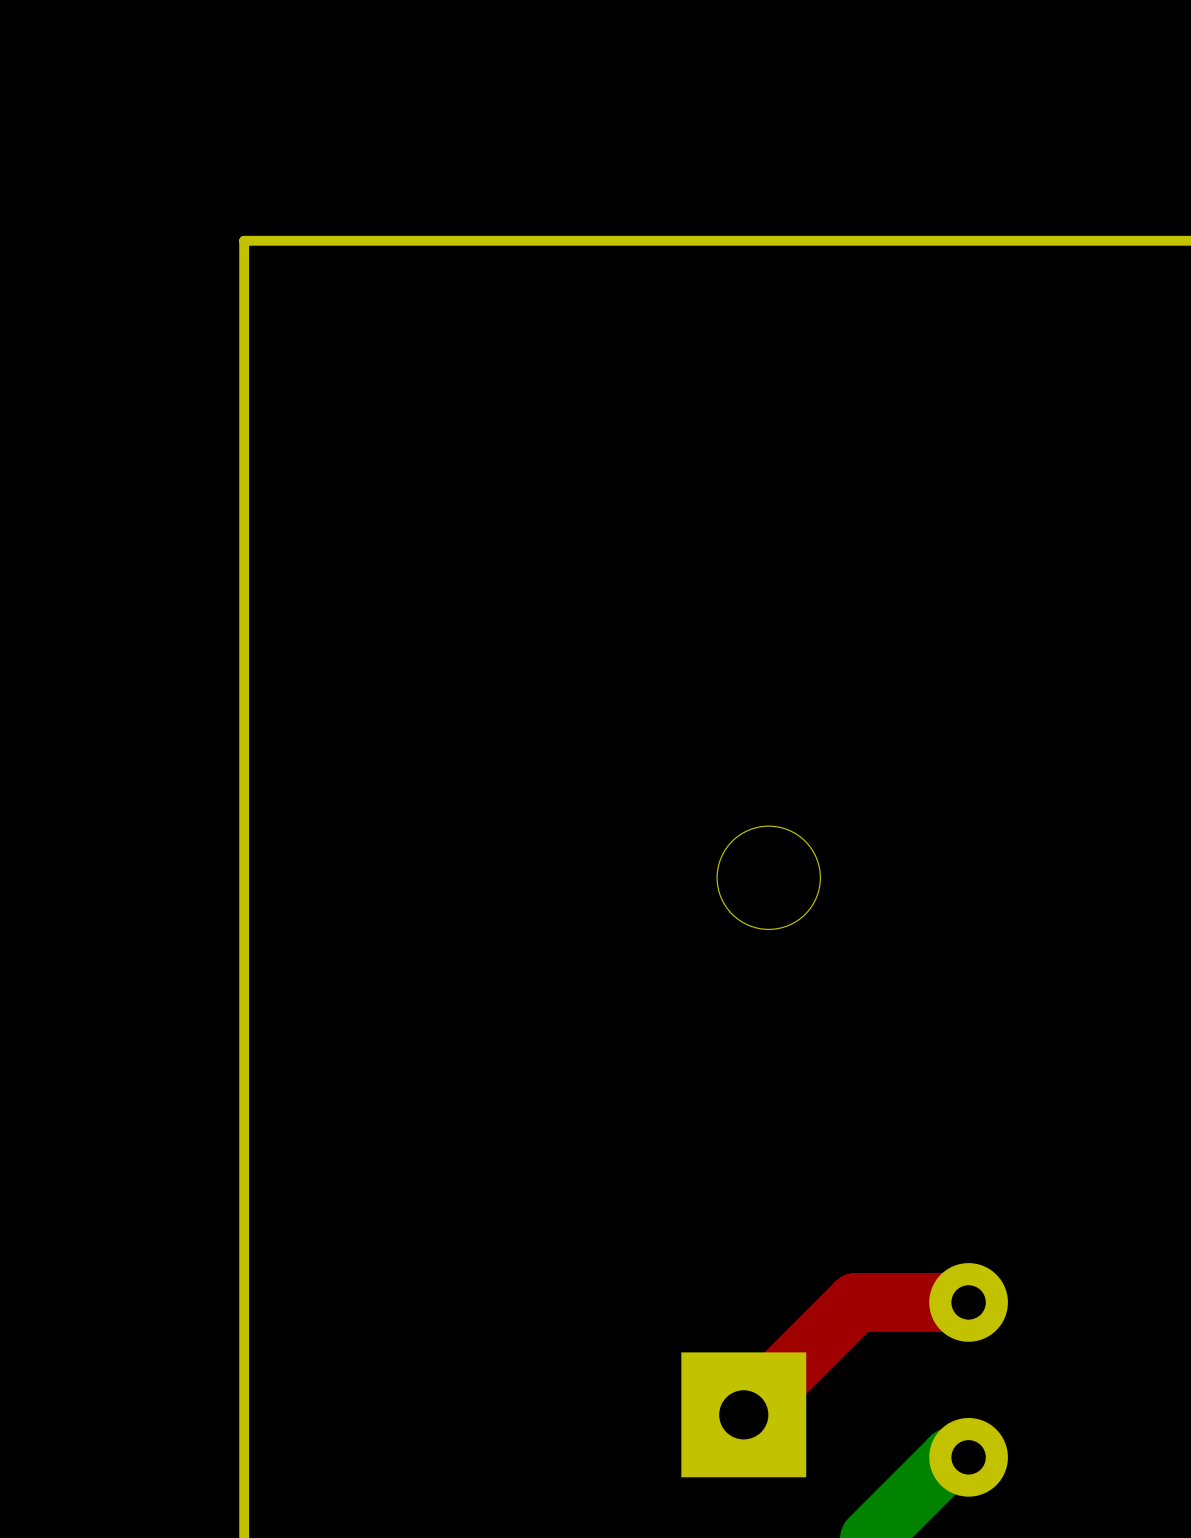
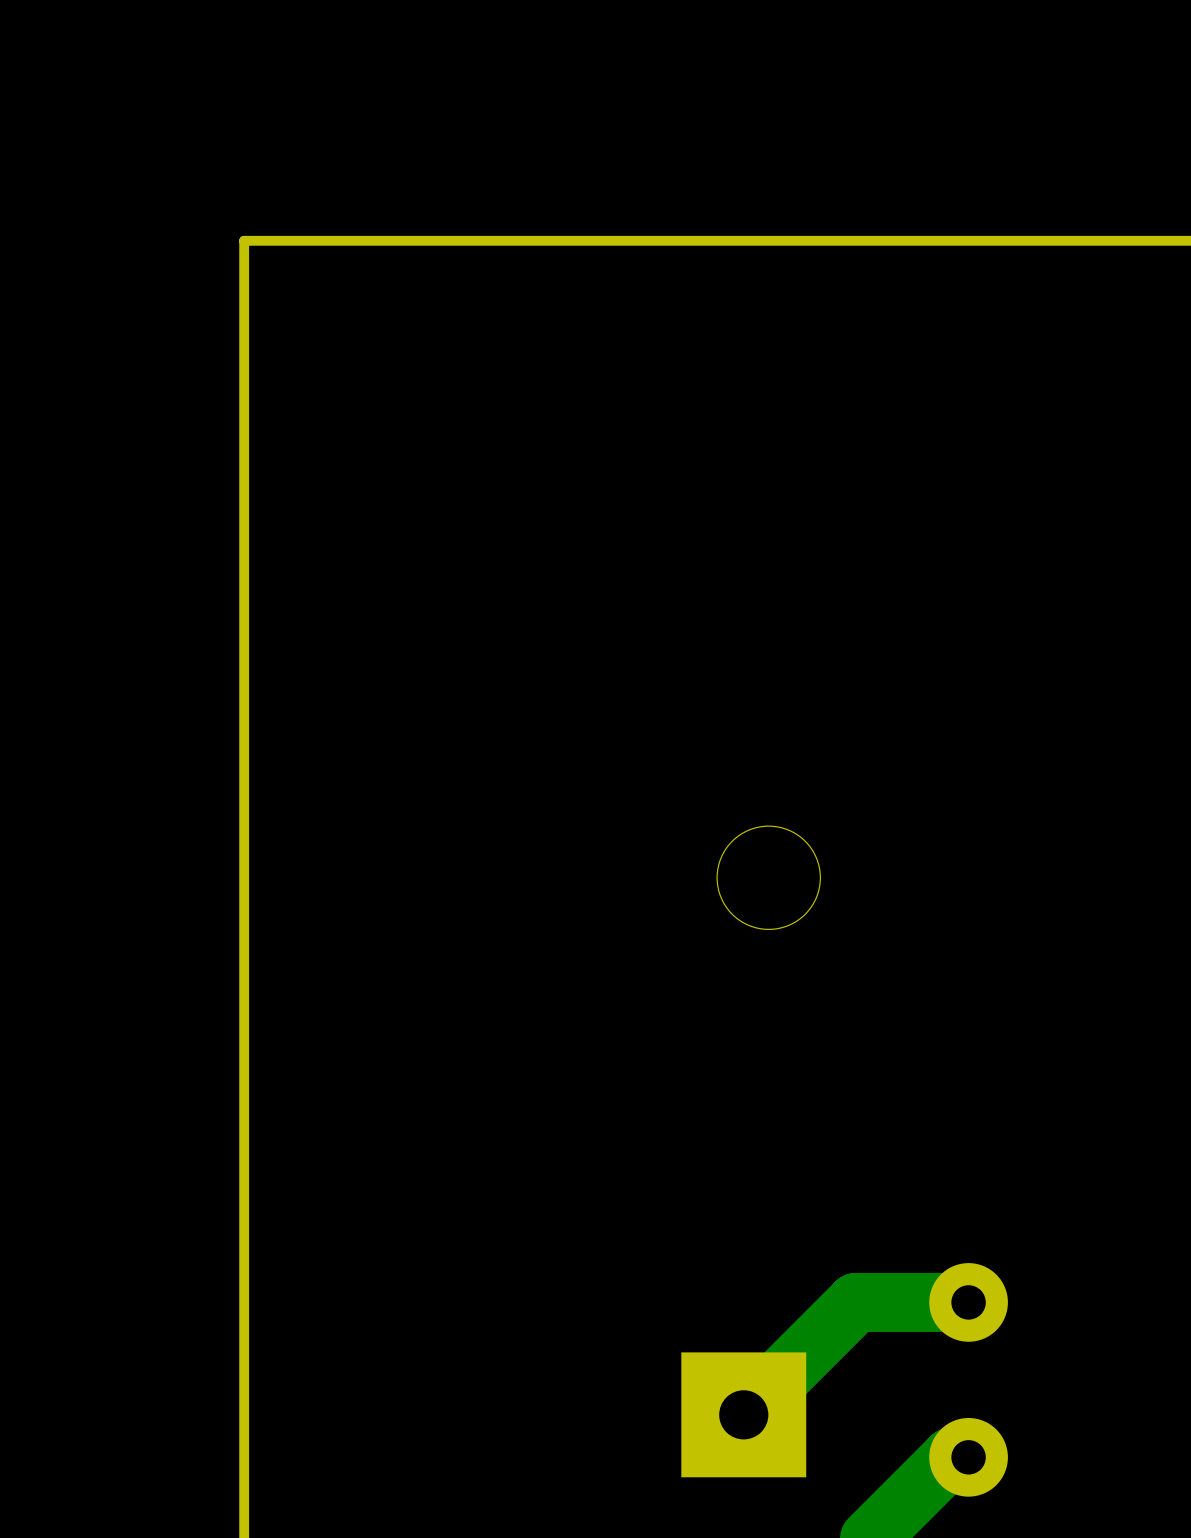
top track: (968, 1302) (856, 1302) (743, 1414) -> none
bottom track: none -> (968, 1302) (856, 1302) (743, 1414)

